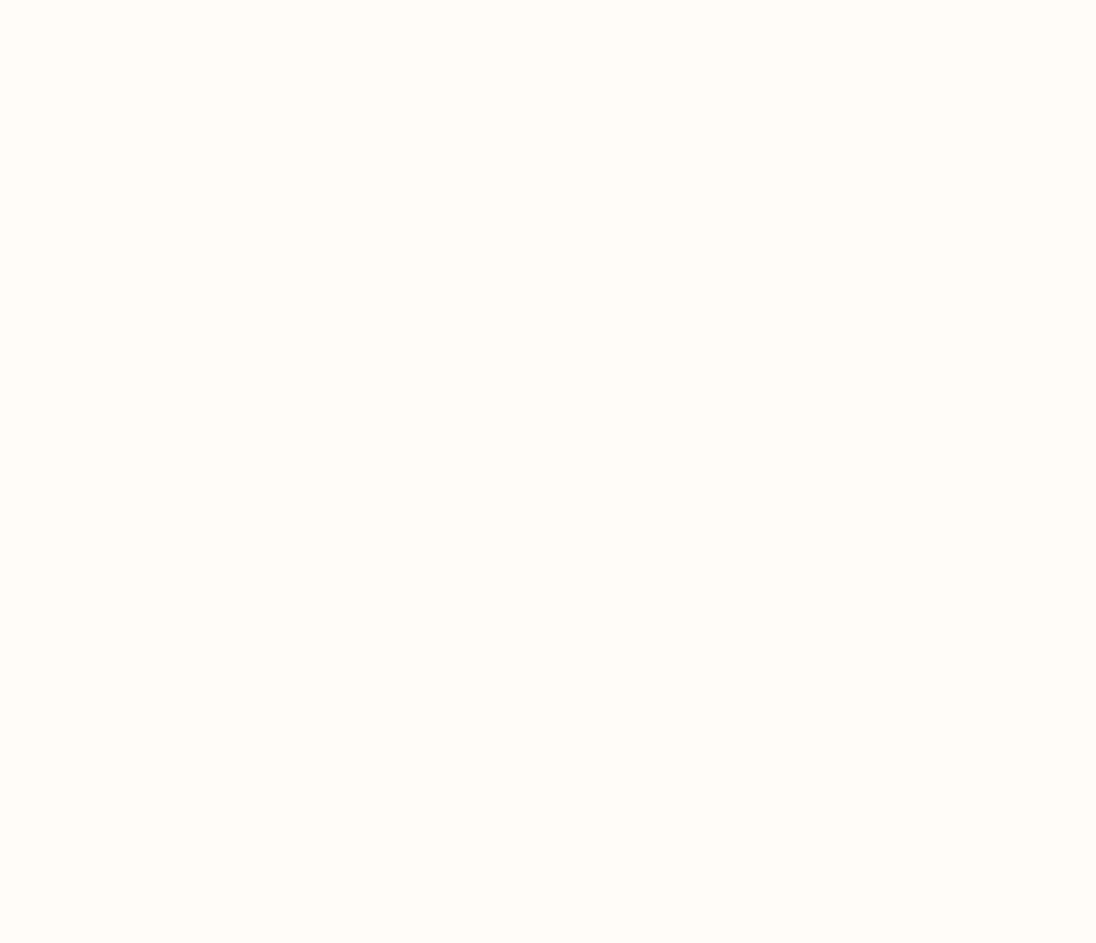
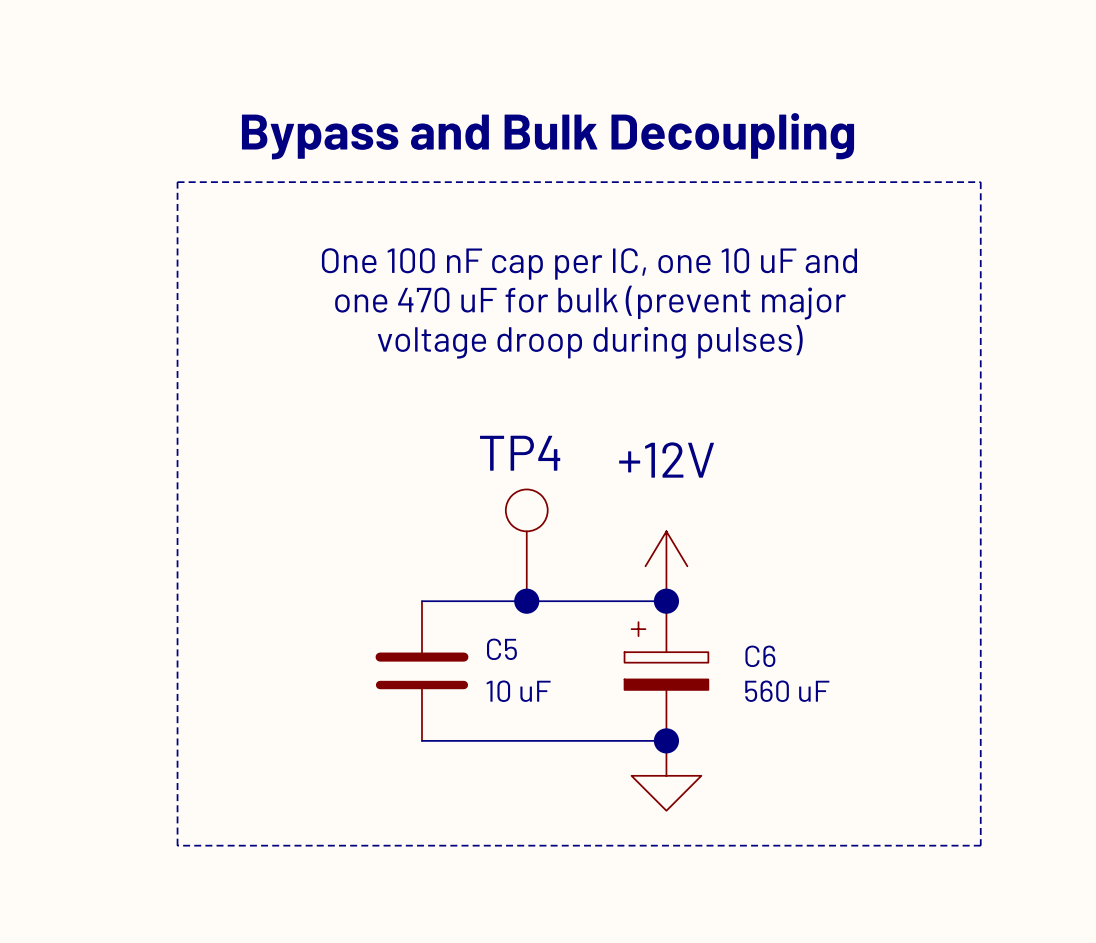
text: none -> Bypass and Bulk Decoupling (548, 136)
line: none -> (177, 182) (980, 182) (980, 845) (177, 845) (177, 182)
text: none -> One 100 nF cap per IC, one 10 uF and (589, 263)
text: none -> one 470 uF for bulk (prevent major (590, 302)
text: none -> voltage droop during pulses) (590, 341)
TP4: none -> (526, 545)
power symbol: none -> +12V (666, 566)
wire: none -> (421, 601) (666, 601)
junction: none -> (526, 601)
junction: none -> (666, 601)
C5: none -> 10 uF (421, 671)
C6: none -> 560 uF (666, 671)
wire: none -> (421, 740) (666, 740)
junction: none -> (666, 740)
power symbol: none -> (666, 775)

